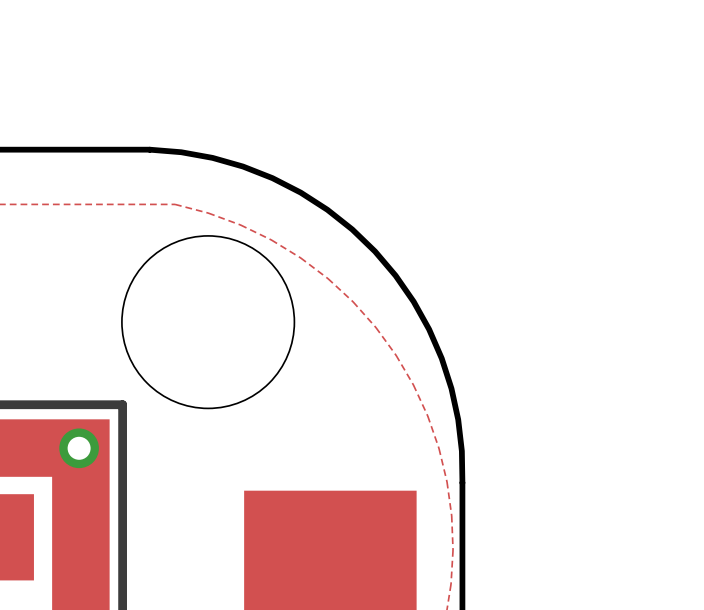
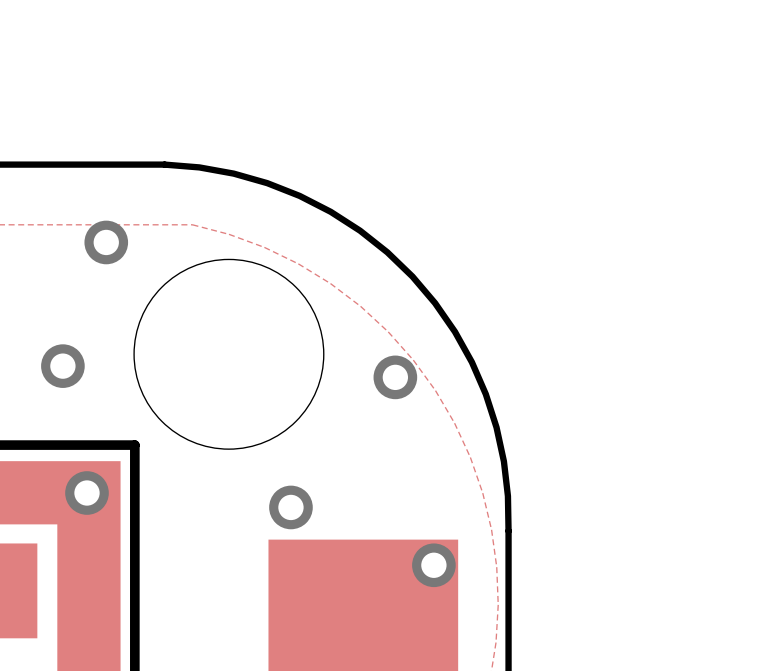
via: none -> (106, 242)
via: none -> (62, 366)
via: none -> (395, 377)
via: none -> (290, 507)
via: none -> (433, 565)

